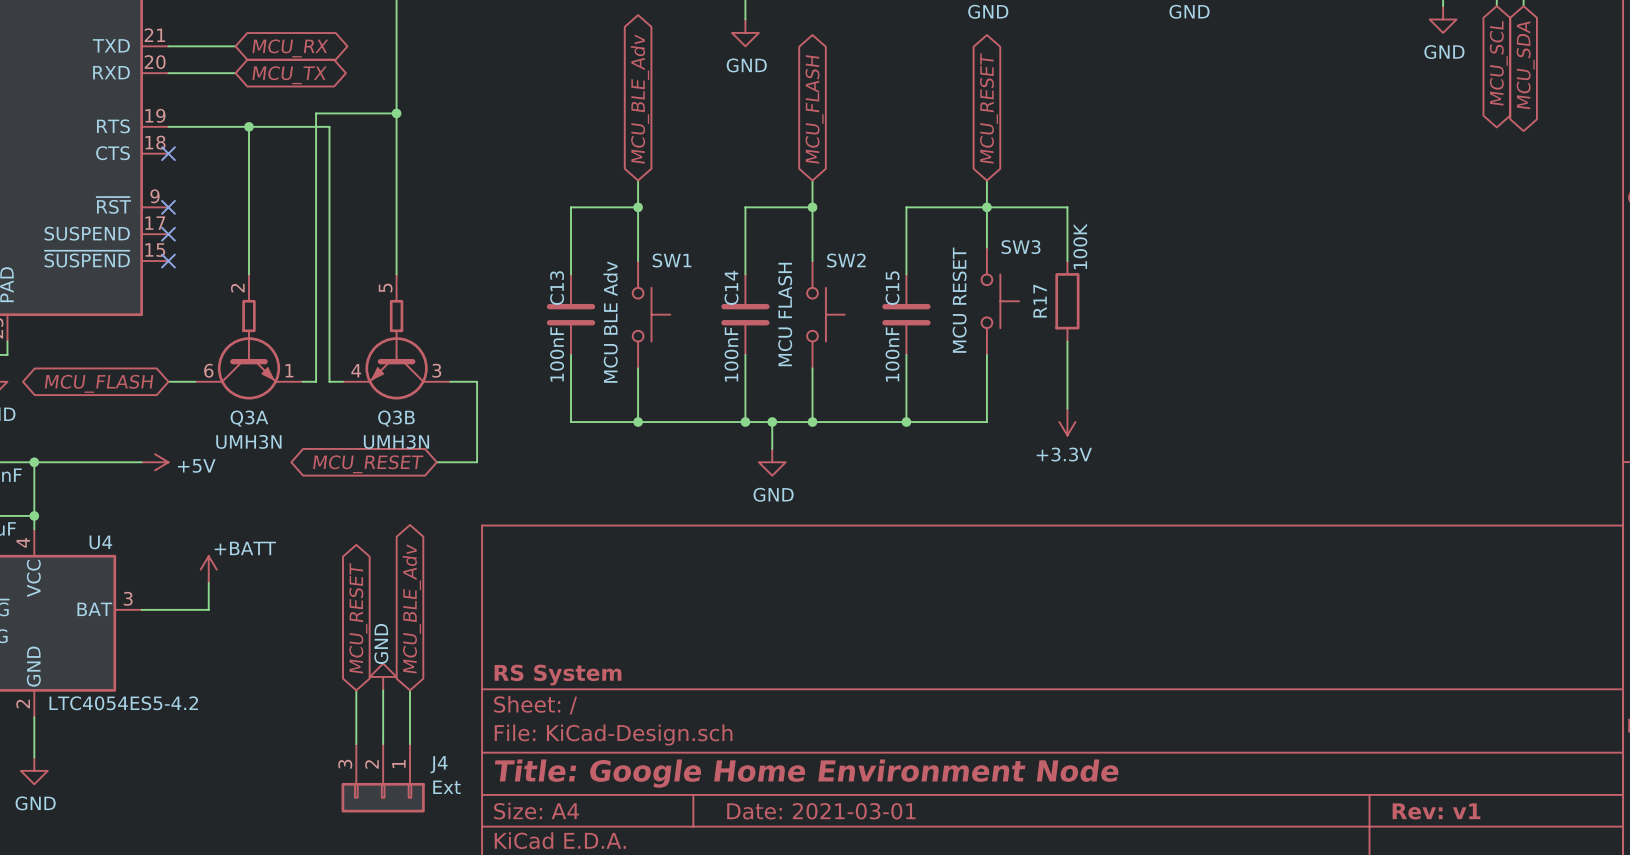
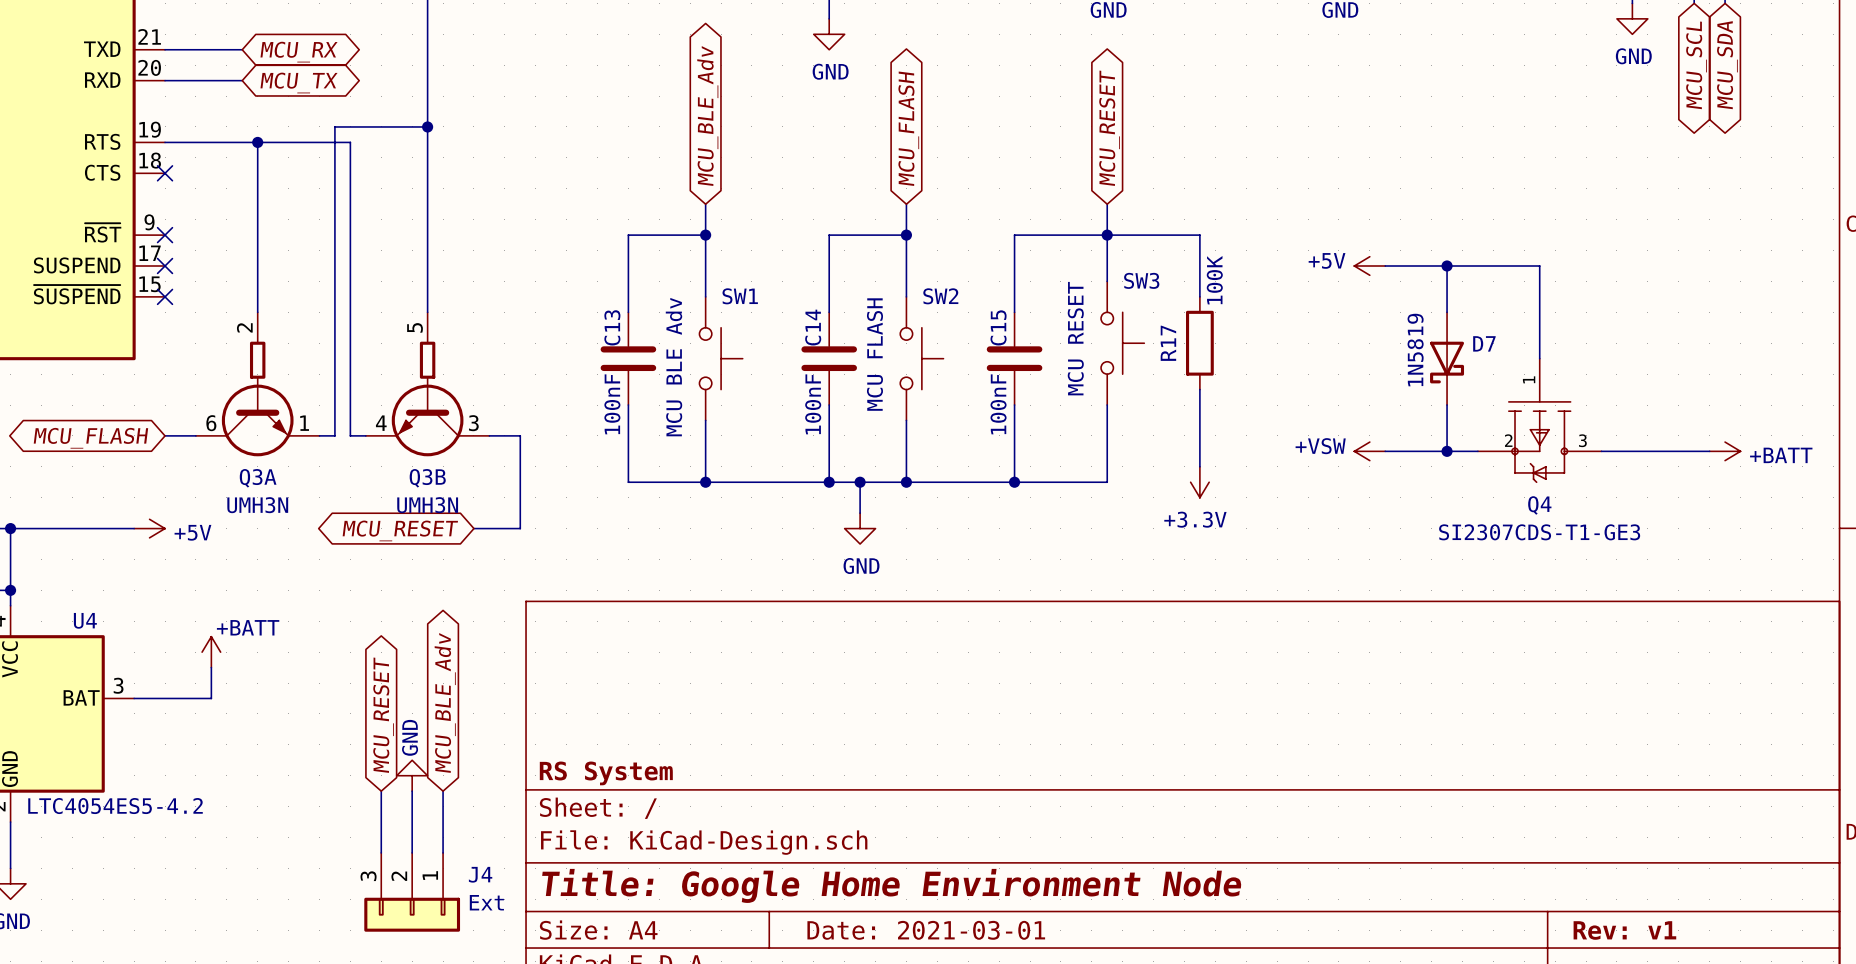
power symbol: none -> +5V (1369, 265)
wire: none -> (1385, 265) (1539, 265) (1539, 358)
wire: none -> (1447, 265) (1447, 312)
junction: none -> (1447, 265)
D7: none -> 1N5819 (1447, 358)
wire: none -> (1447, 405) (1447, 451)
Q4: none -> SI2307CDS-T1-GE3 (1539, 420)
power symbol: none -> +VSW (1369, 451)
wire: none -> (1385, 451) (1477, 451)
junction: none -> (1447, 451)
wire: none -> (1601, 451) (1709, 451)
power symbol: none -> +BATT (1725, 451)

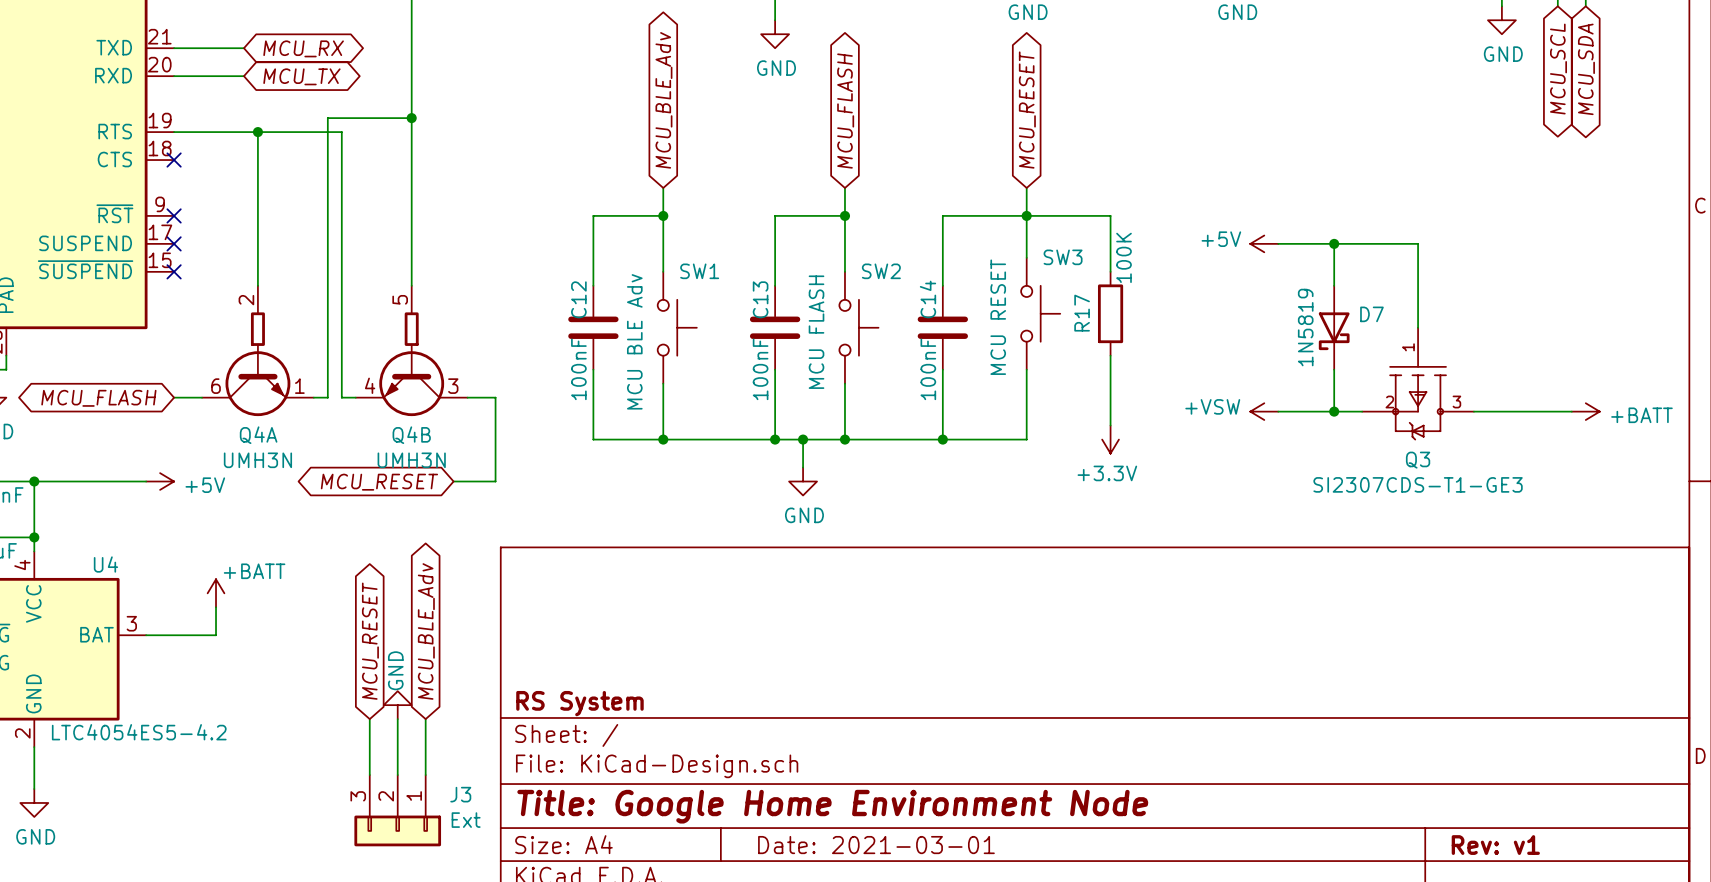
C13 name: C13 (612, 327) -> C12 (578, 299)
C14 name: C14 (813, 327) -> C13 (760, 299)
C15 name: C15 (998, 327) -> C14 (927, 299)
Q3A name: Q3A (258, 478) -> Q4A (258, 435)
Q3B name: Q3B (427, 478) -> Q4B (411, 435)
Q4 name: Q4 (1539, 505) -> Q3 (1418, 460)
J4 name: J4 (480, 874) -> J3 (460, 794)

